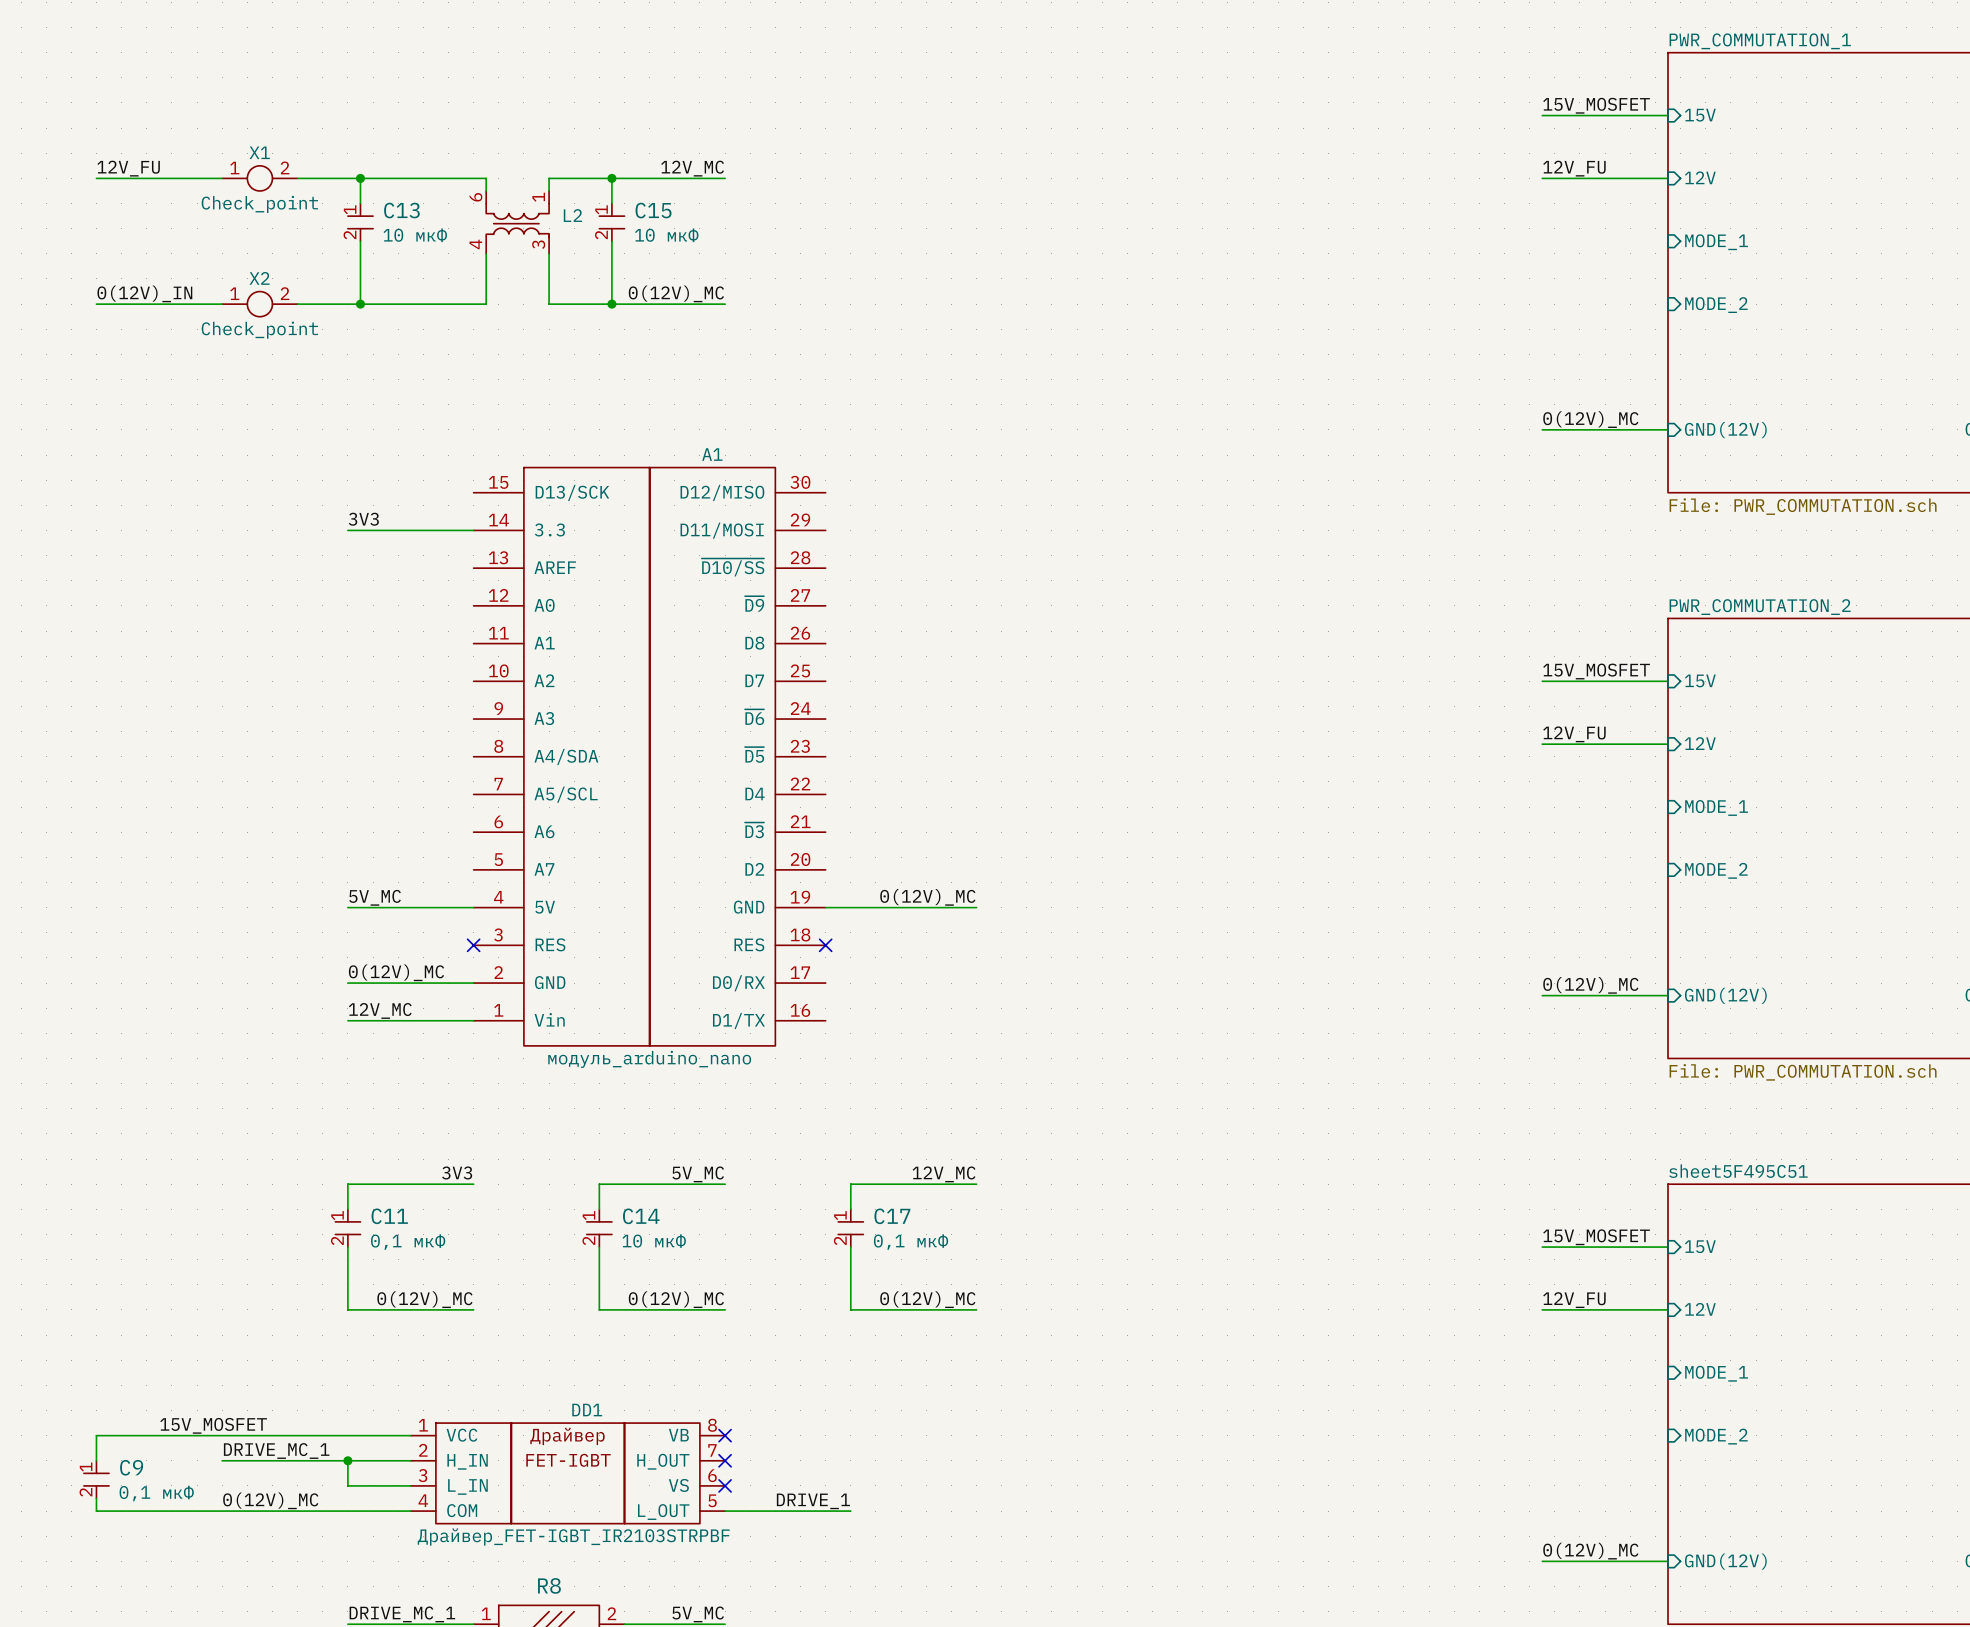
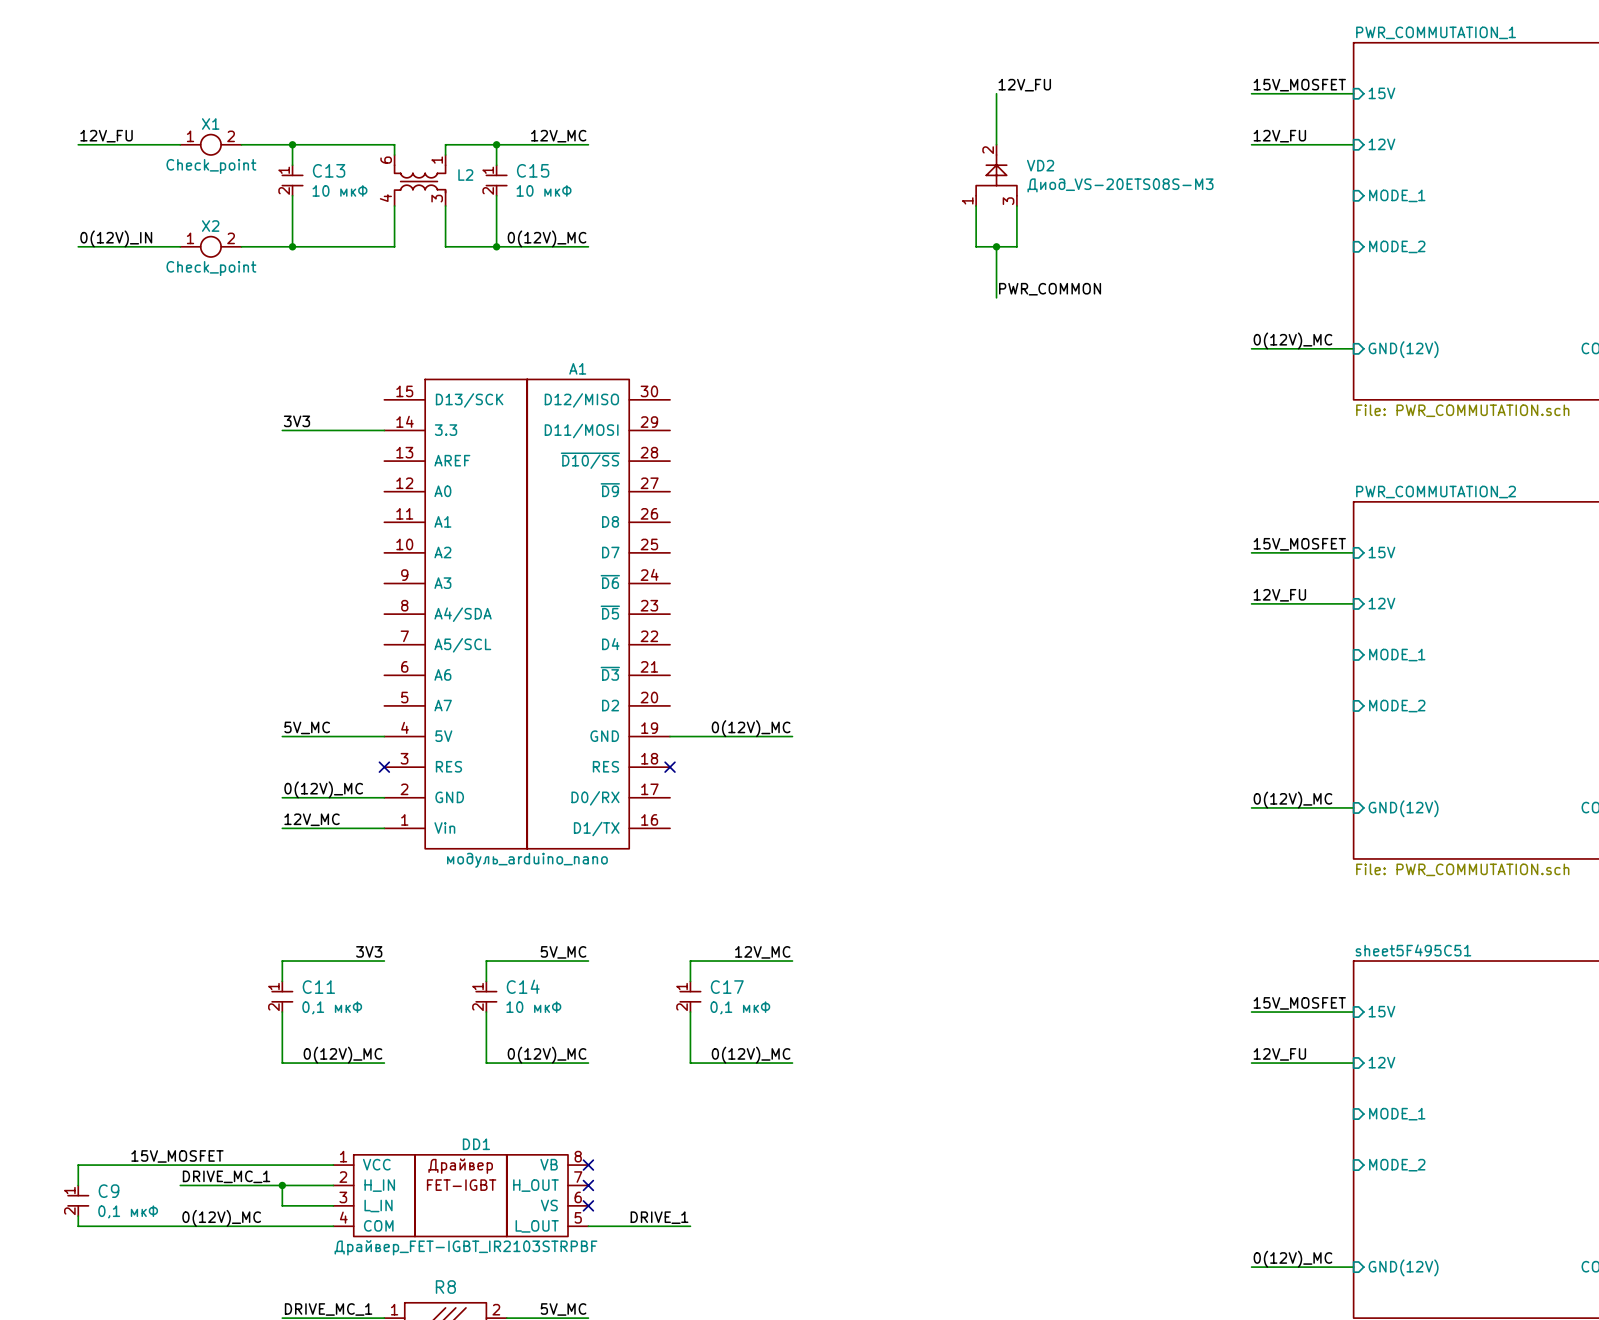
label: none -> 12V_FU (1024, 85)
wire: none -> (996, 93) (996, 144)
VD2: none -> Диод_VS-20ETS08S-M3 (996, 175)
wire: none -> (976, 206) (976, 246) (1016, 246) (1016, 206)
wire: none -> (996, 246) (996, 297)
junction: none -> (996, 246)
label: none -> PWR_COMMON (1050, 289)

